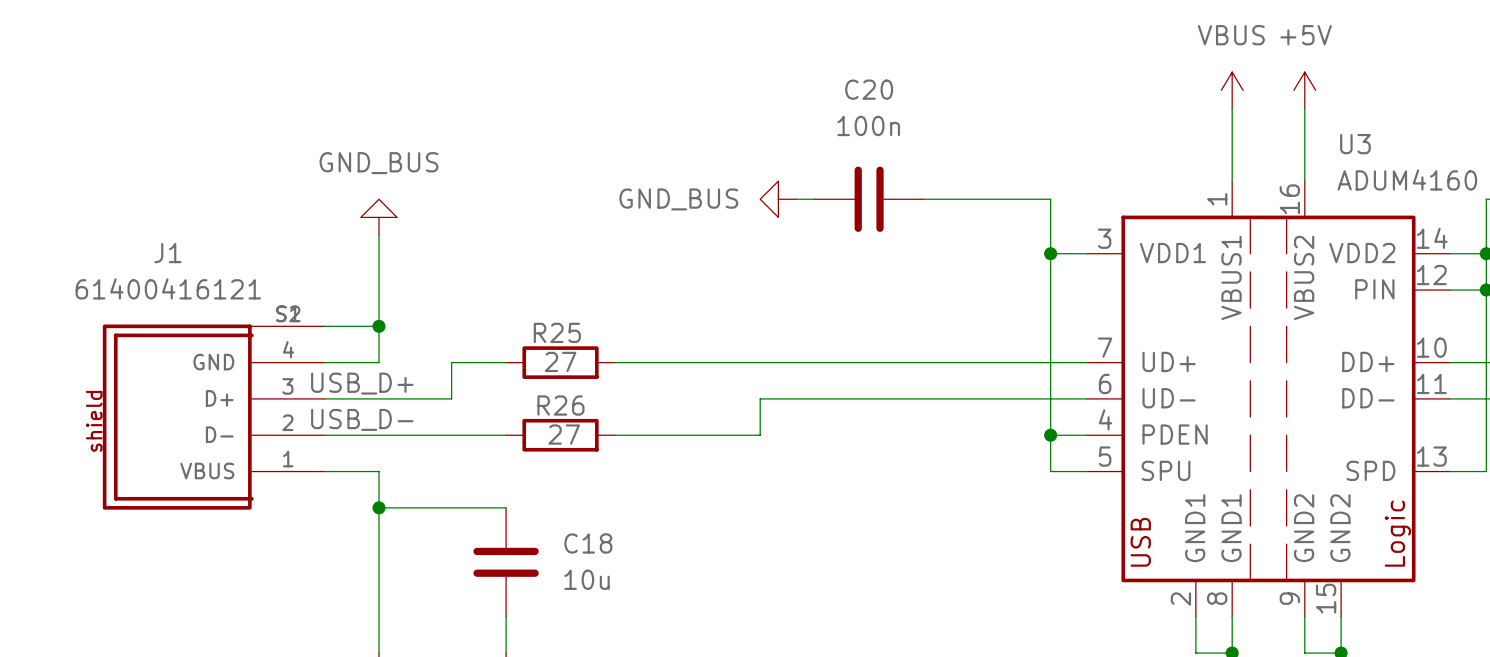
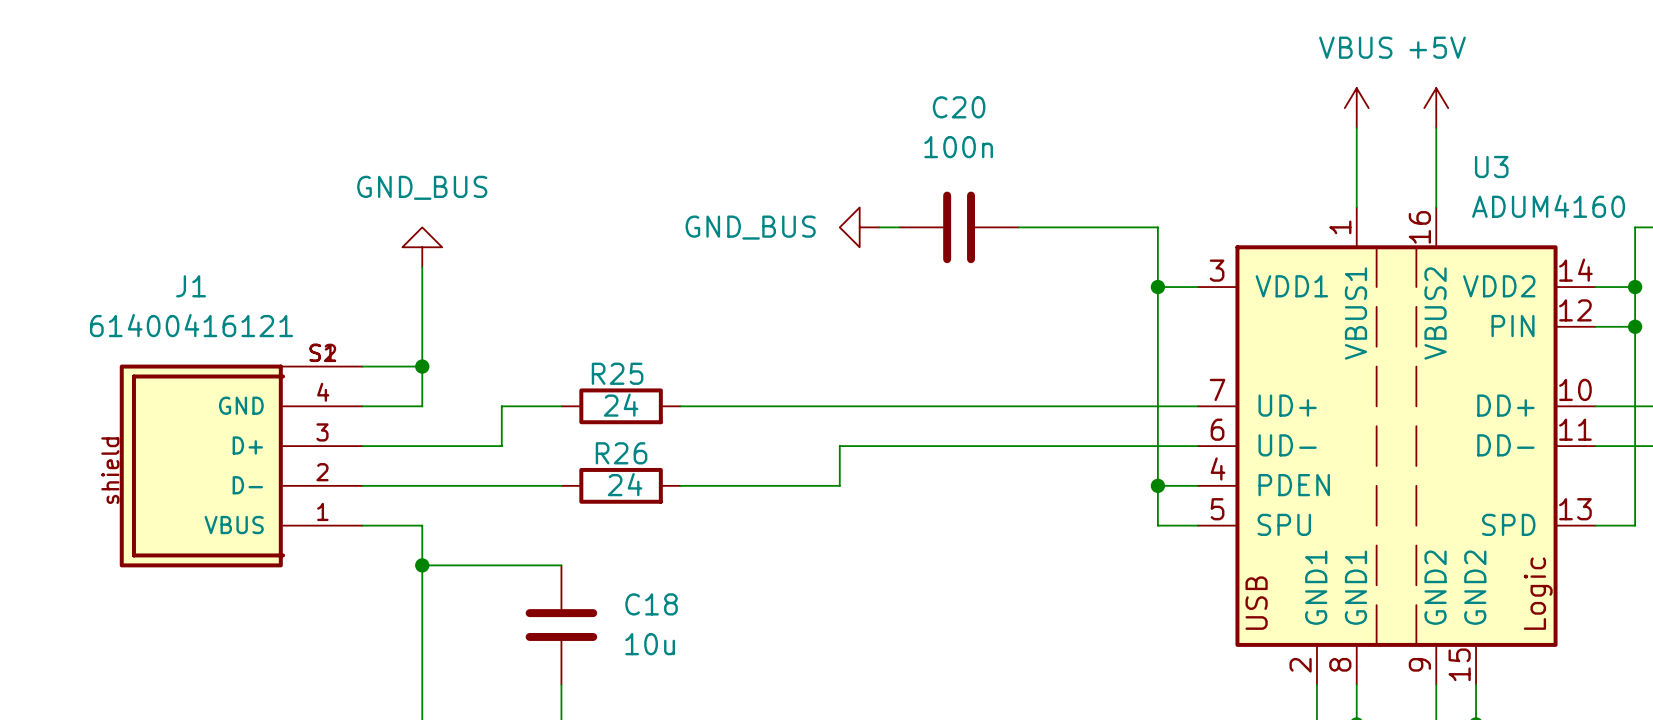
R25 value: 27 (560, 361) -> 24 (621, 405)
label: USB_D+ (362, 383) -> none
label: USB_D- (362, 419) -> none
R26 value: 27 (564, 434) -> 24 (625, 484)

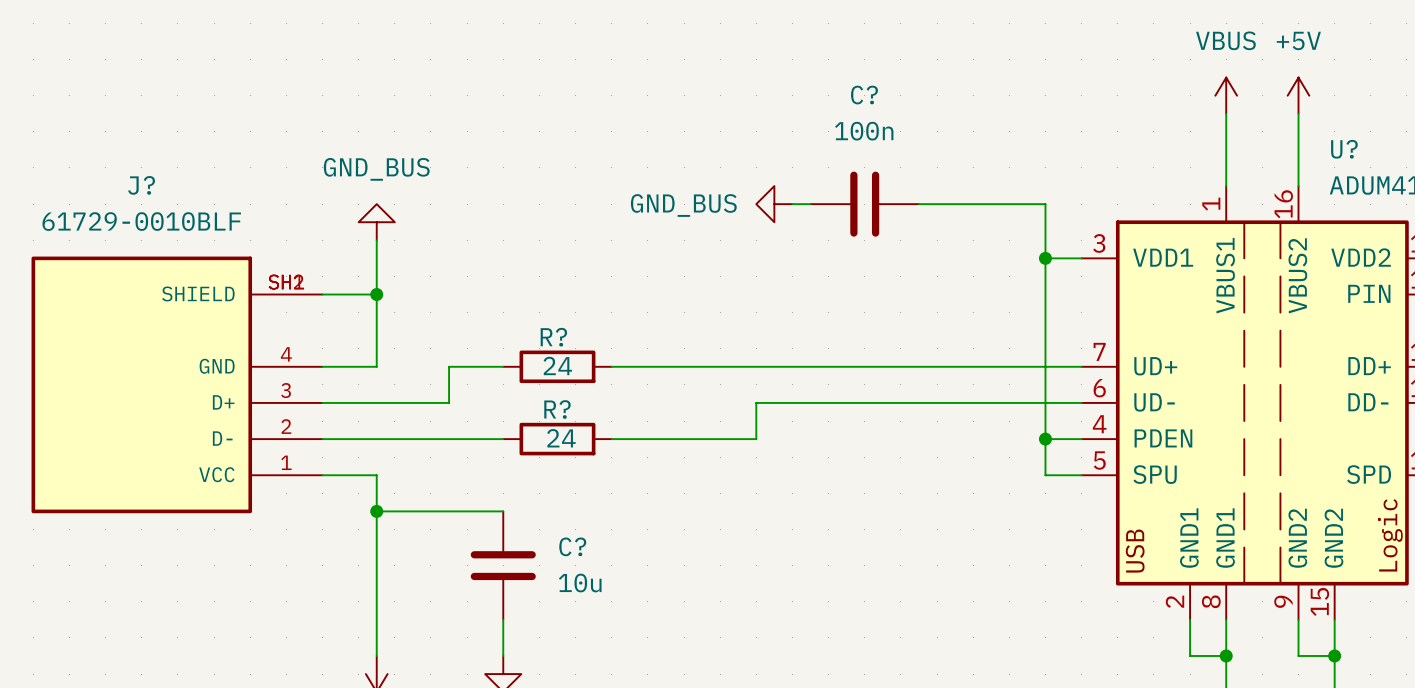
C20 name: C20 (959, 107) -> C? (864, 95)
U3 name: U3 (1491, 166) -> U? (1344, 149)
wire: (362, 366) (422, 366) -> (322, 294) (376, 294)
junction position: (422, 366) -> (376, 294)
R25 name: R25 (617, 373) -> R? (553, 337)
J?: none -> 61729-0010BLF (177, 384)
R26 name: R26 (621, 453) -> R? (557, 409)
J1: 61400416121 (241, 465) -> none
C18 name: C18 (651, 604) -> C? (572, 546)

